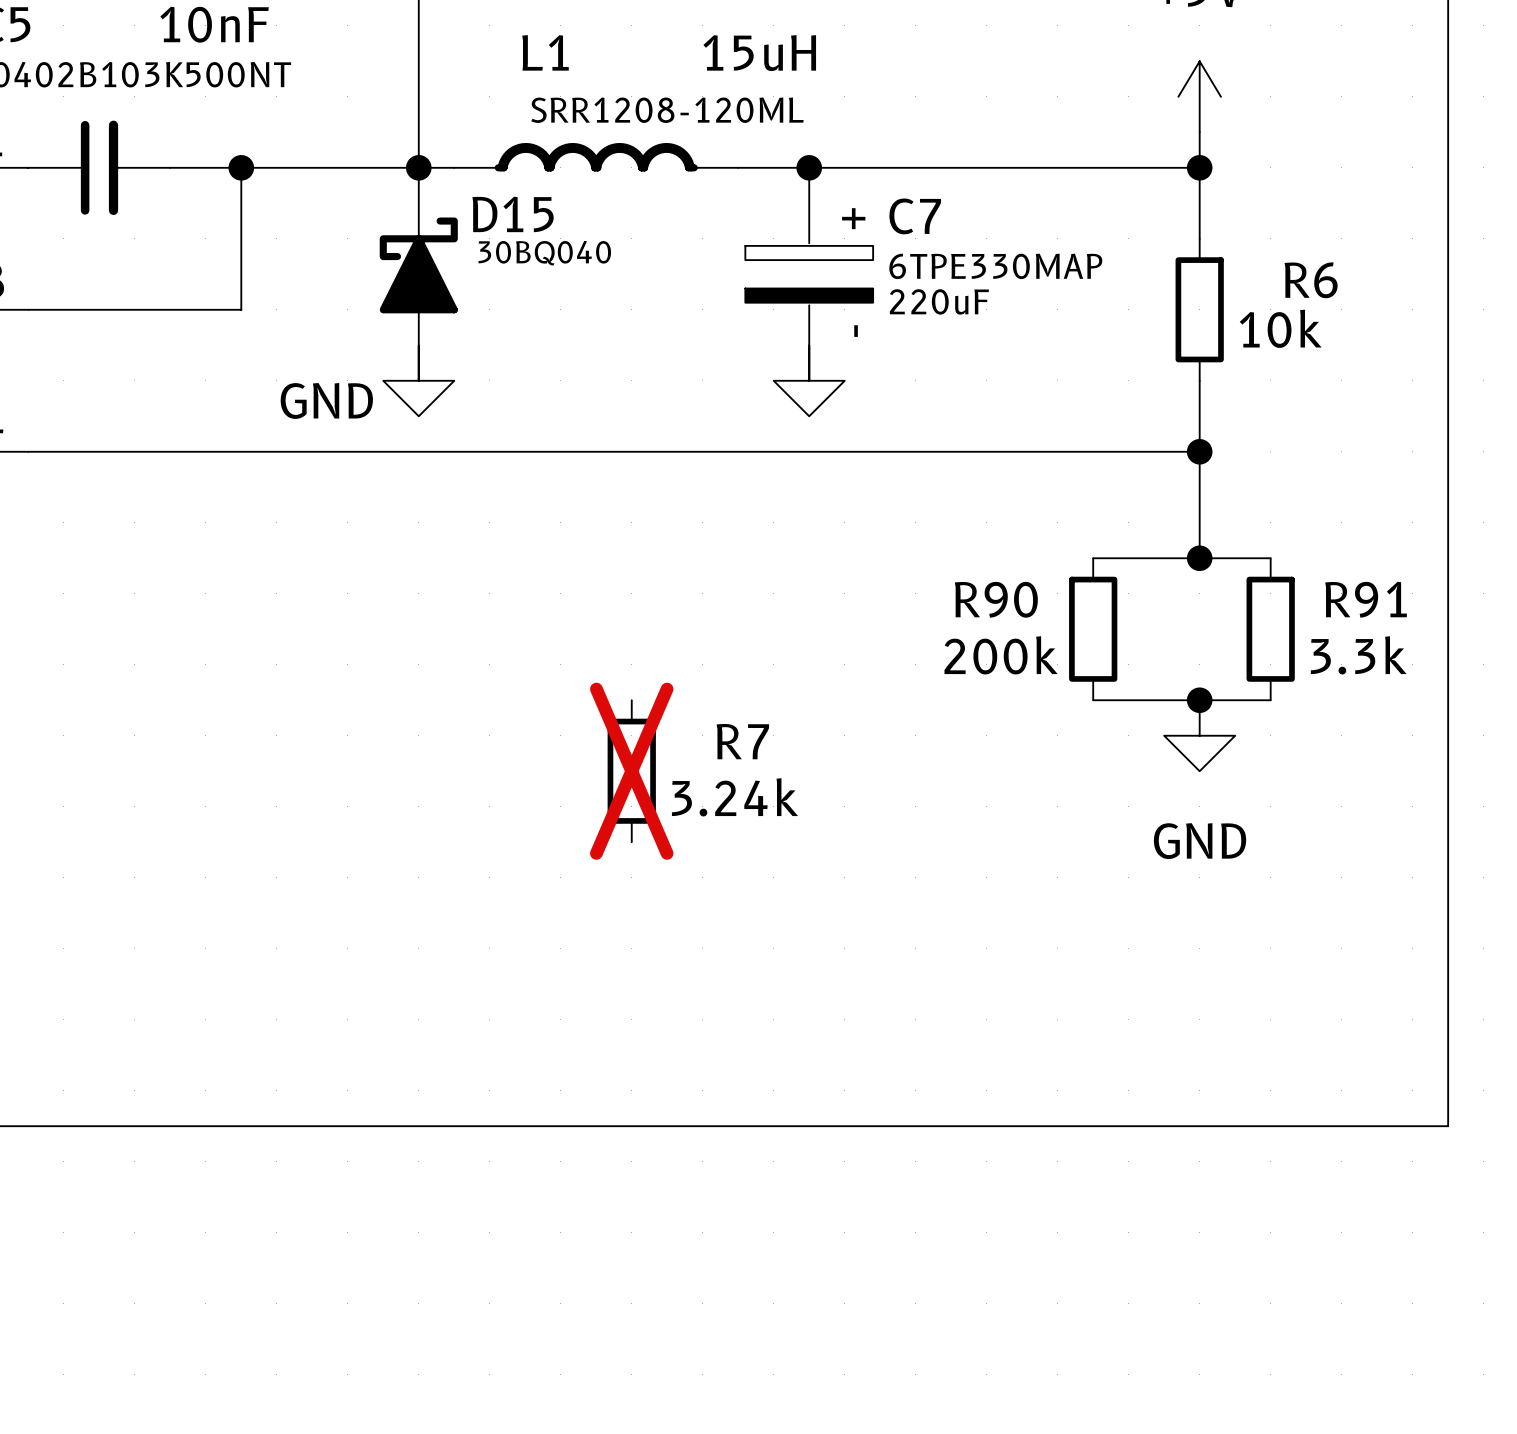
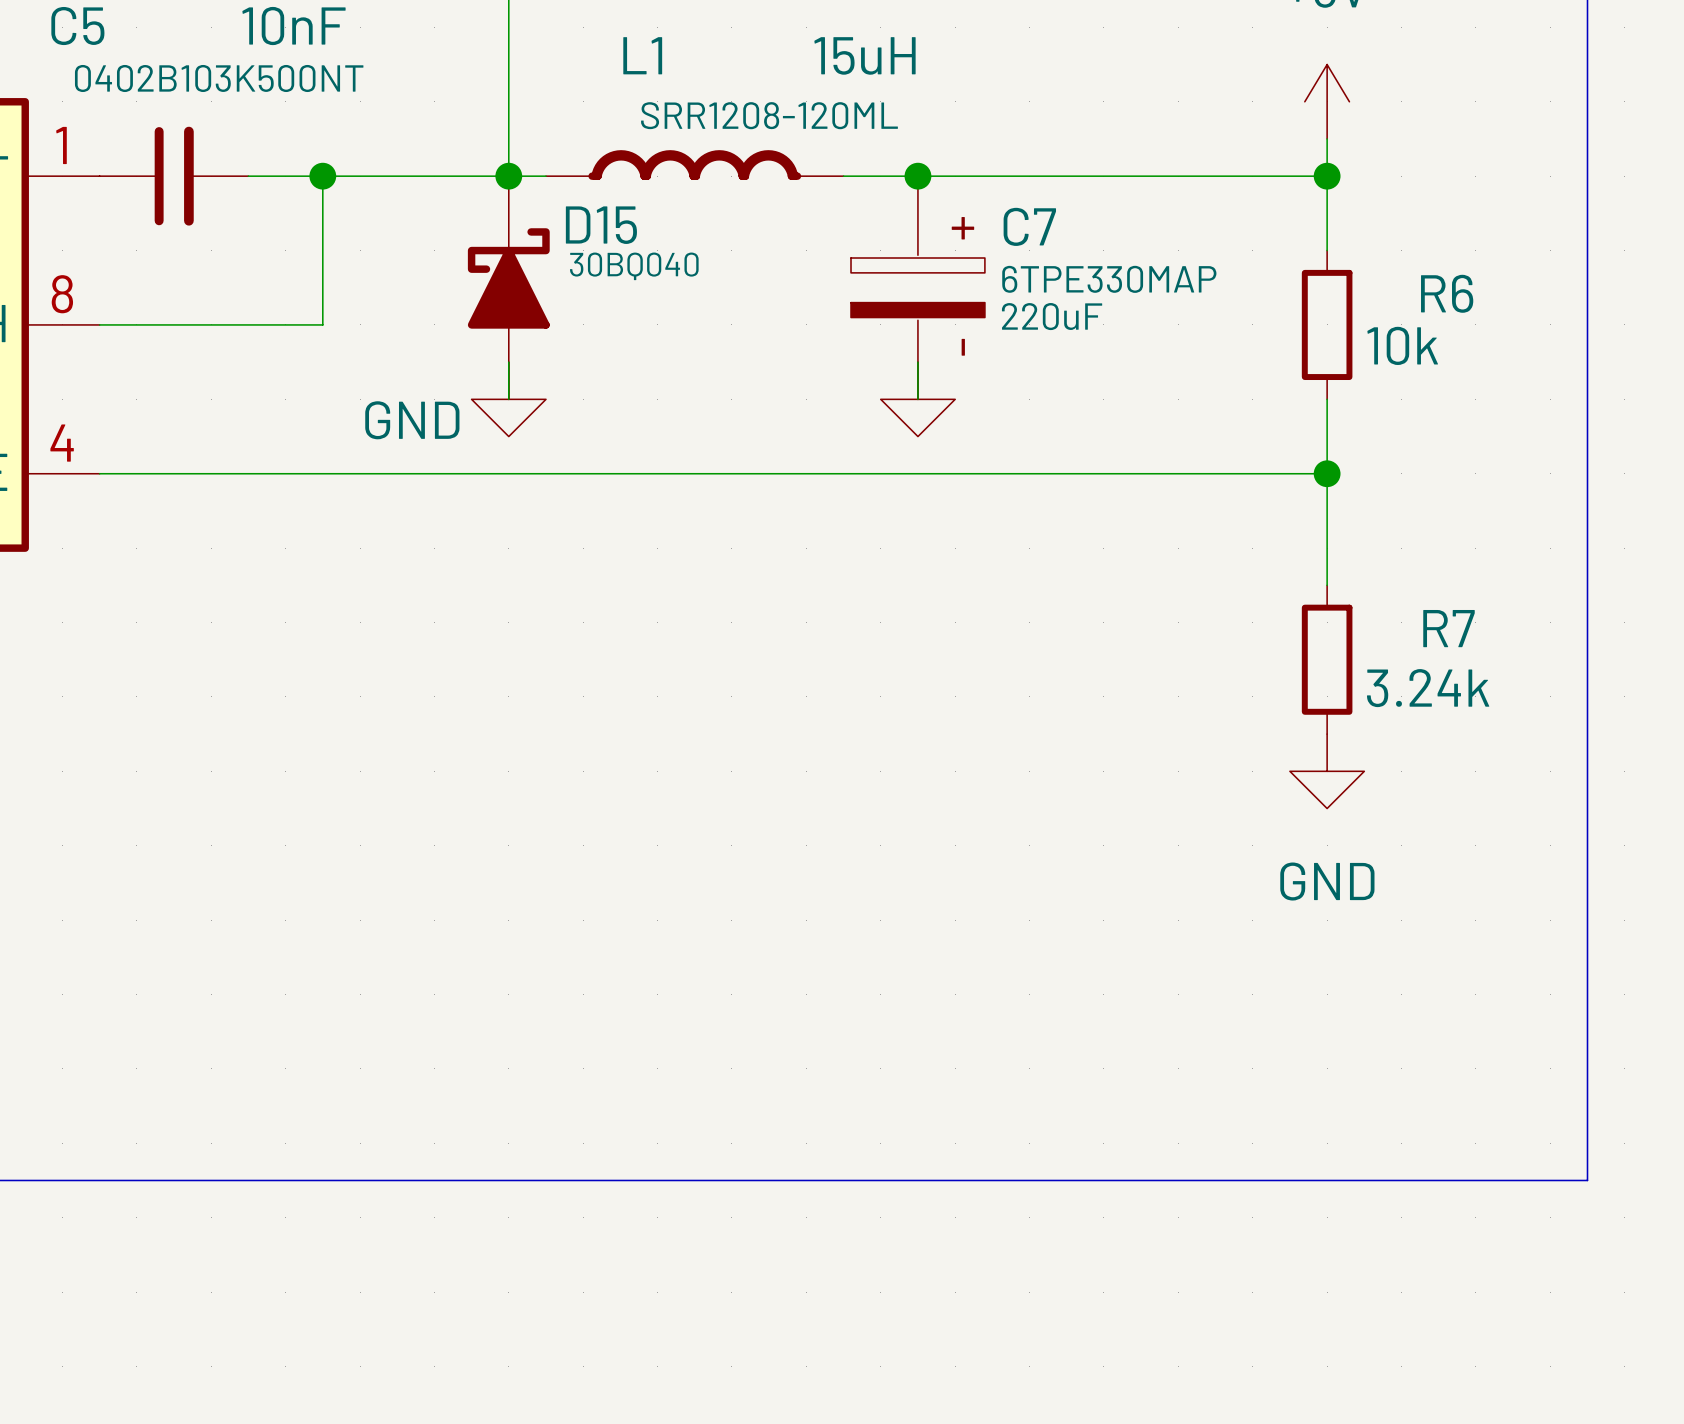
wire: (1093, 558) (1270, 558) -> none
junction: (1199, 558) -> none
R90: 200k (1093, 629) -> none
R91: 3.3k (1270, 629) -> none
wire: (1093, 700) (1270, 700) -> none
junction: (1199, 700) -> none
R7 position: (631, 771) -> (1327, 659)
R7 do-not-place cross: (631, 771) -> none

